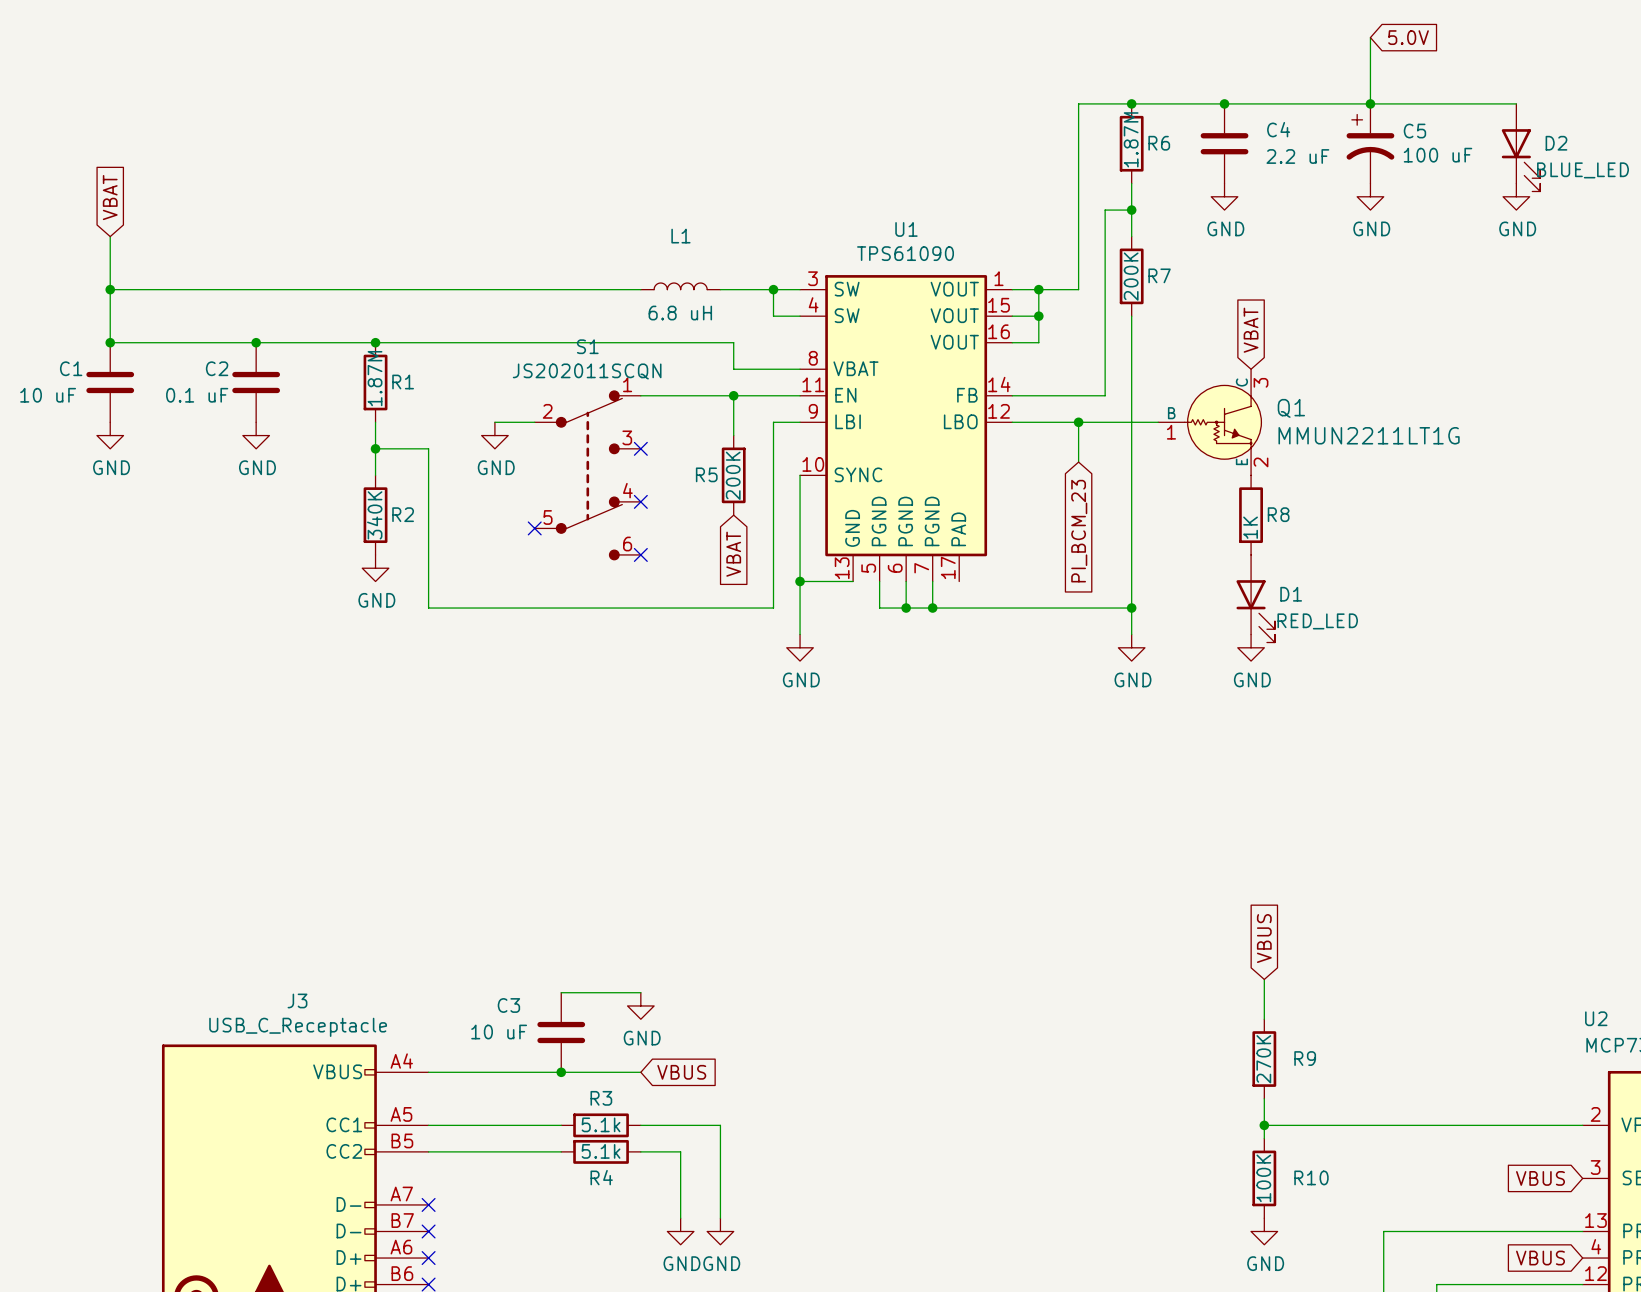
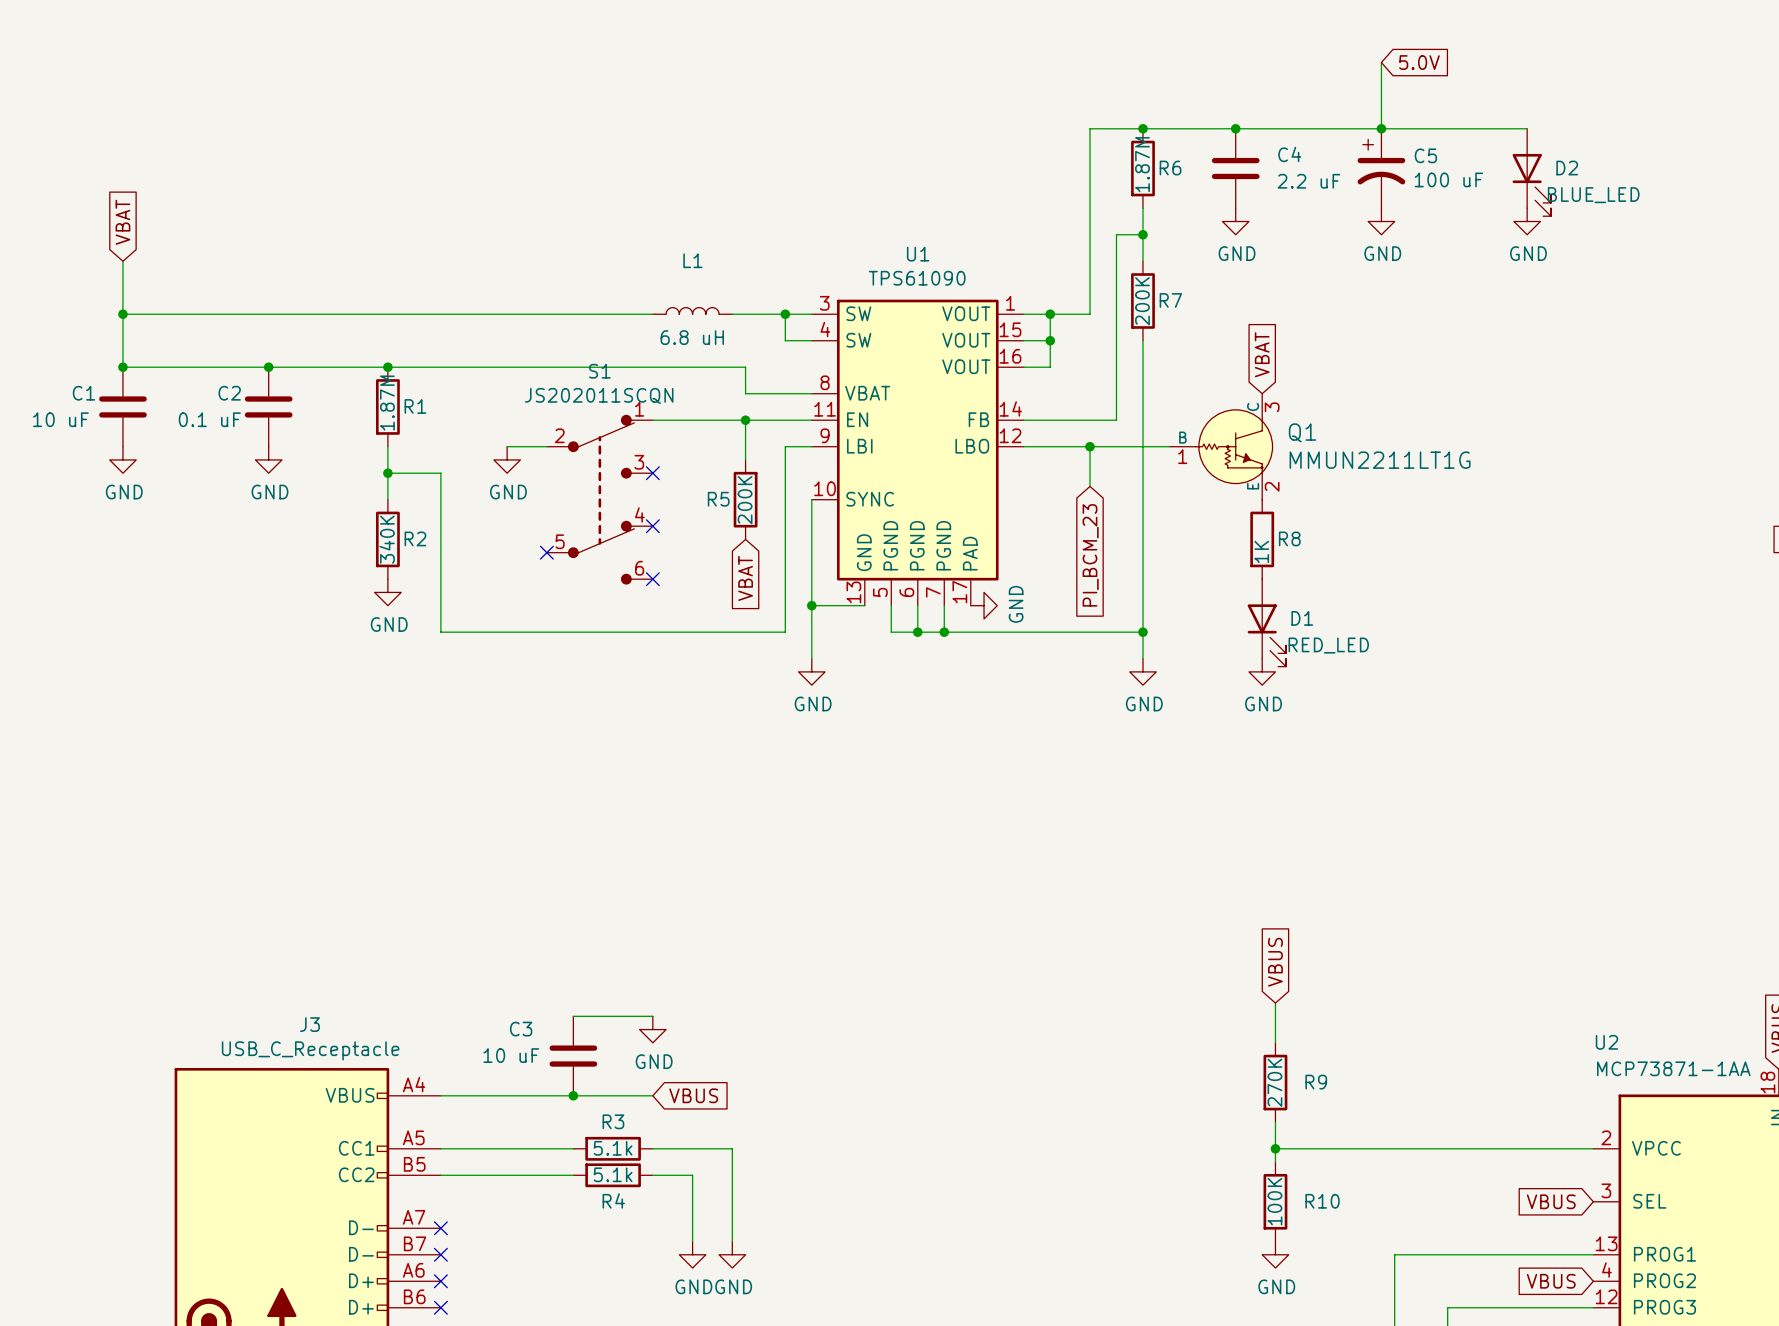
power symbol: none -> GND (984, 605)

